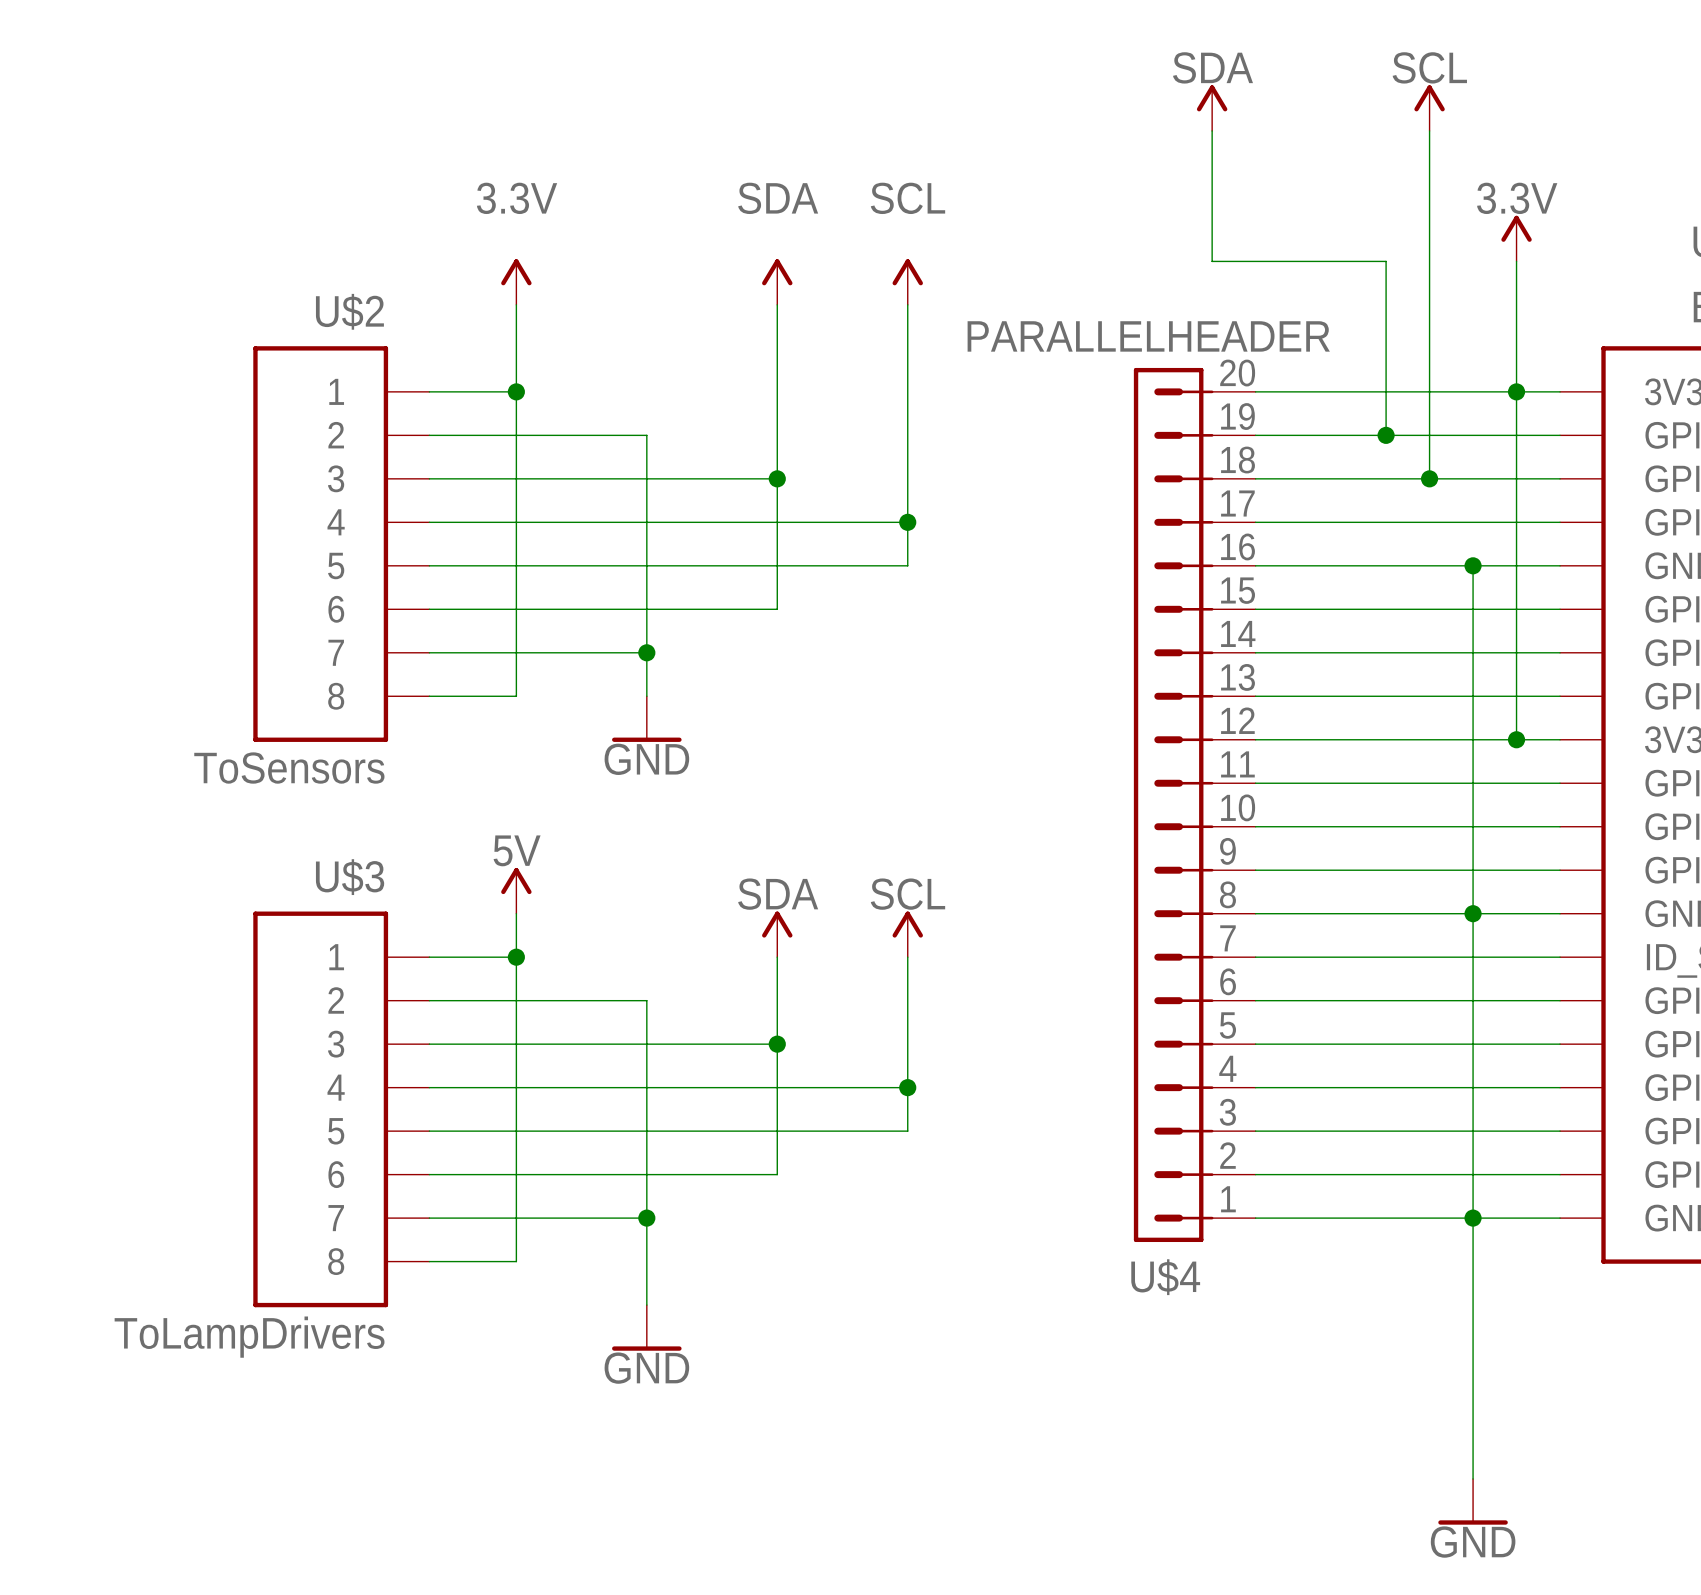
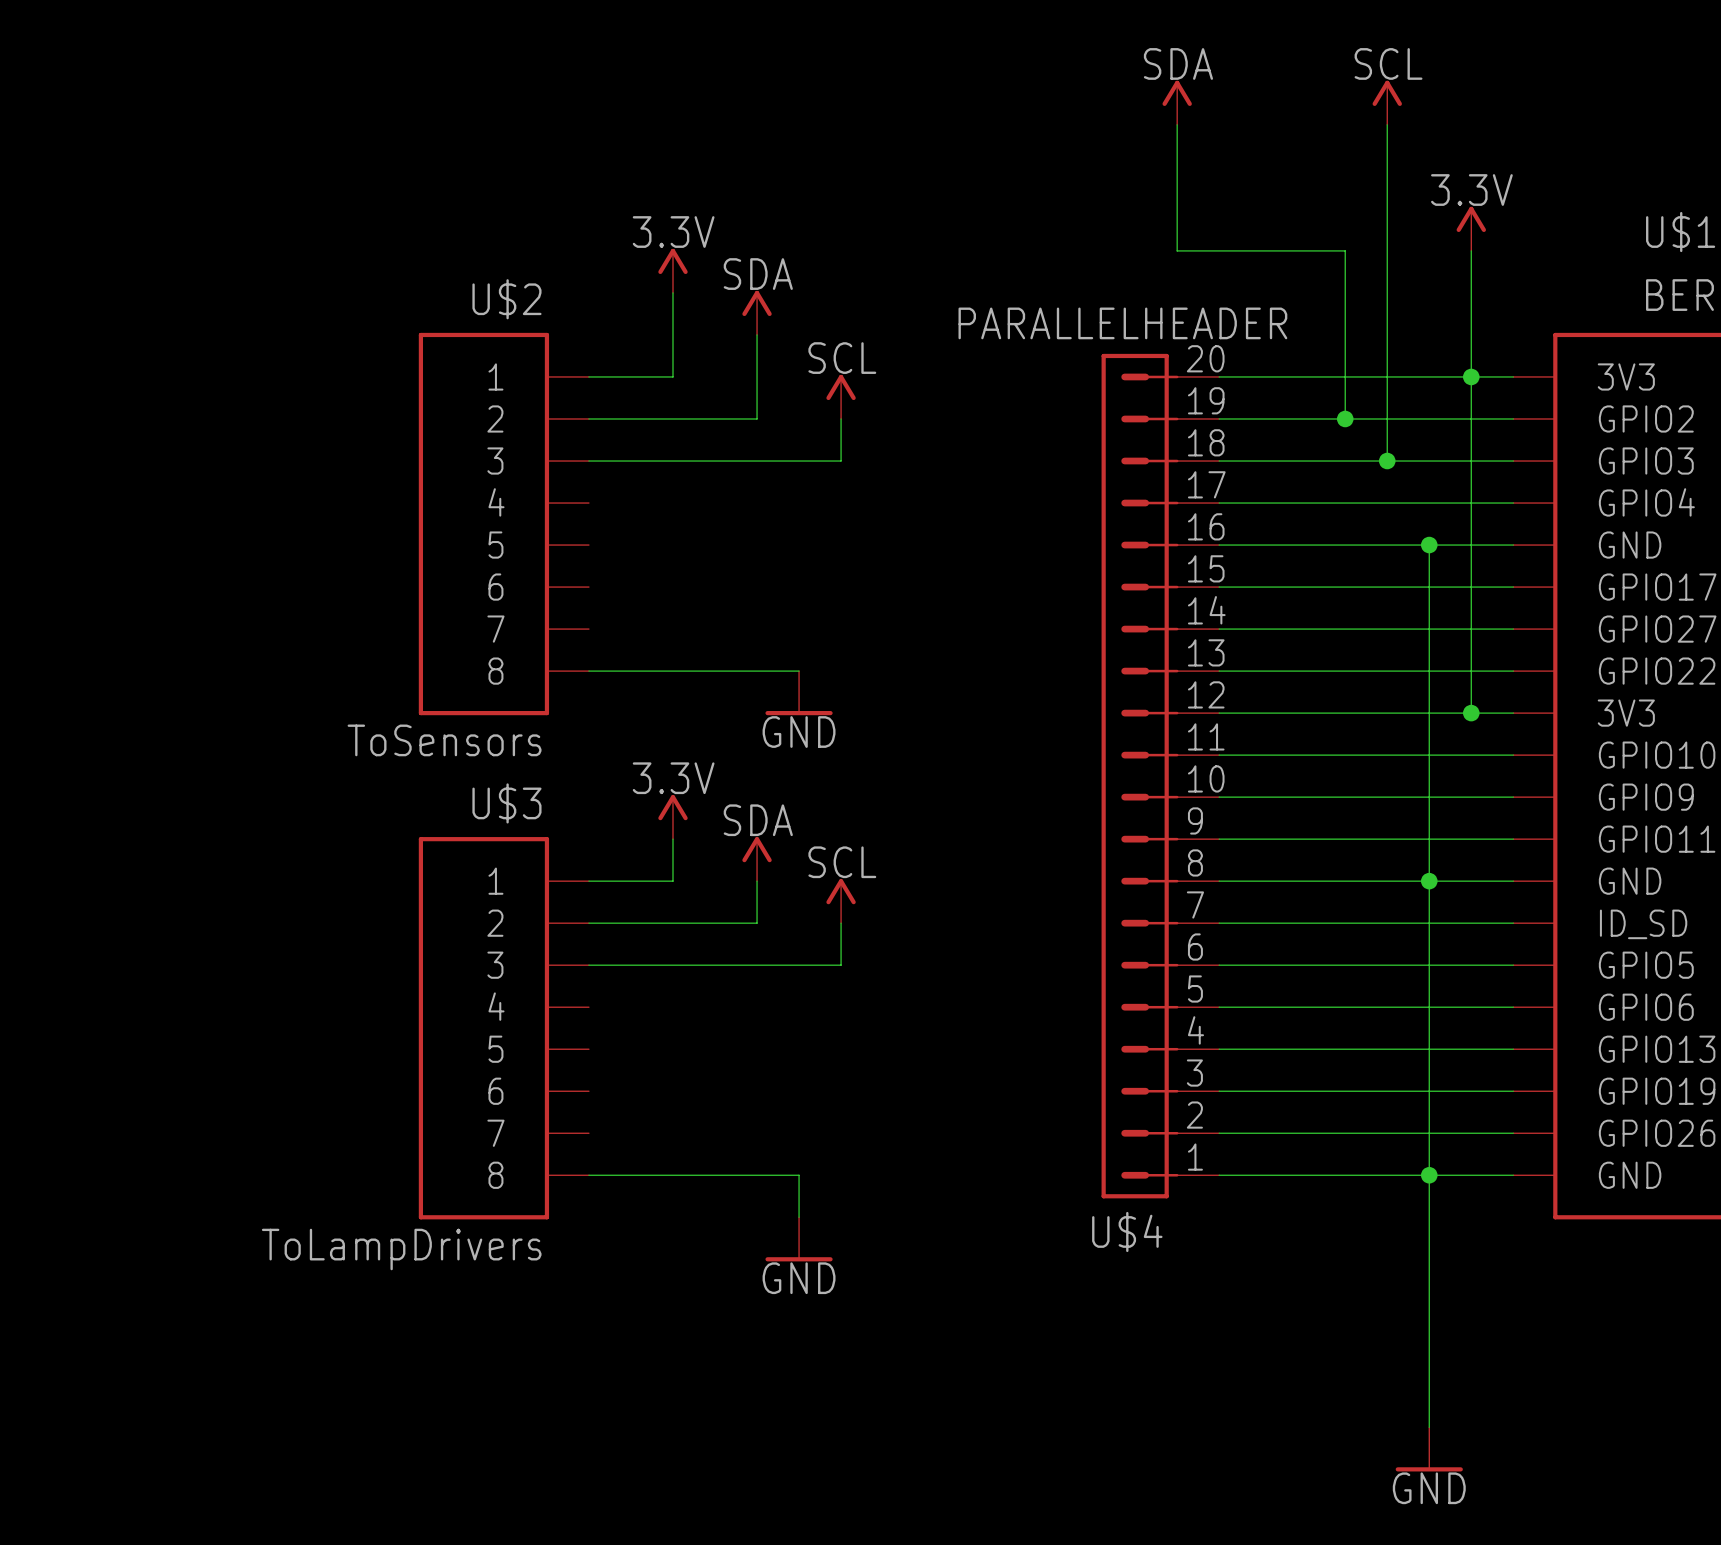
power symbol text position: 3.3V (517, 198) -> 3.3V (673, 232)
power symbol text position: SDA (778, 198) -> SDA (758, 274)
power symbol text position: SCL (907, 198) -> SCL (842, 358)
power symbol position: 3.3V (516, 282) -> 3.3V (673, 270)
power symbol position: SDA (777, 282) -> SDA (757, 312)
power symbol position: SCL (907, 282) -> SCL (841, 396)
wire: (516, 304) (516, 696) (429, 696) -> none
wire: none -> (673, 292) (673, 376) (588, 376)
wire: (907, 304) (907, 565) (429, 565) -> none
wire: (429, 391) (516, 391) -> none
junction: (516, 391) -> none
wire: (429, 435) (603, 435) -> none
wire: (646, 435) (646, 696) -> none
wire: (777, 435) (777, 609) (429, 609) -> (757, 418) (630, 418)
wire: none -> (841, 418) (841, 461) (757, 461)
wire: (429, 478) (603, 478) -> none
junction: (777, 478) -> none
wire: (429, 522) (907, 522) -> none
junction: (907, 522) -> none
U$2 position: (341, 544) -> (503, 524)
wire: (429, 652) (646, 652) -> (588, 671) (799, 671)
junction: (646, 652) -> none
power symbol position: GND (646, 719) -> GND (799, 693)
power symbol: none -> 3.3V (673, 817)
wire: none -> (673, 839) (673, 881) (588, 881)
power symbol: 5V (516, 890) -> none
wire: (516, 913) (516, 1261) (429, 1261) -> none
wire: none -> (757, 881) (757, 923) (588, 923)
power symbol position: SDA (777, 934) -> SDA (757, 859)
power symbol position: SCL (907, 934) -> SCL (841, 901)
wire: (429, 957) (516, 957) -> none
junction: (516, 957) -> none
wire: (777, 957) (777, 1174) (429, 1174) -> none
wire: (907, 957) (907, 1131) (429, 1131) -> none
wire: (429, 1000) (603, 1000) -> none
wire: (646, 1000) (646, 1305) -> (630, 965) (841, 965) (841, 923)
wire: (429, 1044) (777, 1044) -> none
junction: (777, 1044) -> none
wire: (429, 1087) (907, 1087) -> none
junction: (907, 1087) -> none
U$3 position: (341, 1109) -> (503, 1028)
wire: (429, 1218) (603, 1218) -> none
wire: none -> (630, 1175) (799, 1175) (799, 1217)
junction: (646, 1218) -> none
power symbol position: GND (646, 1327) -> GND (799, 1239)

